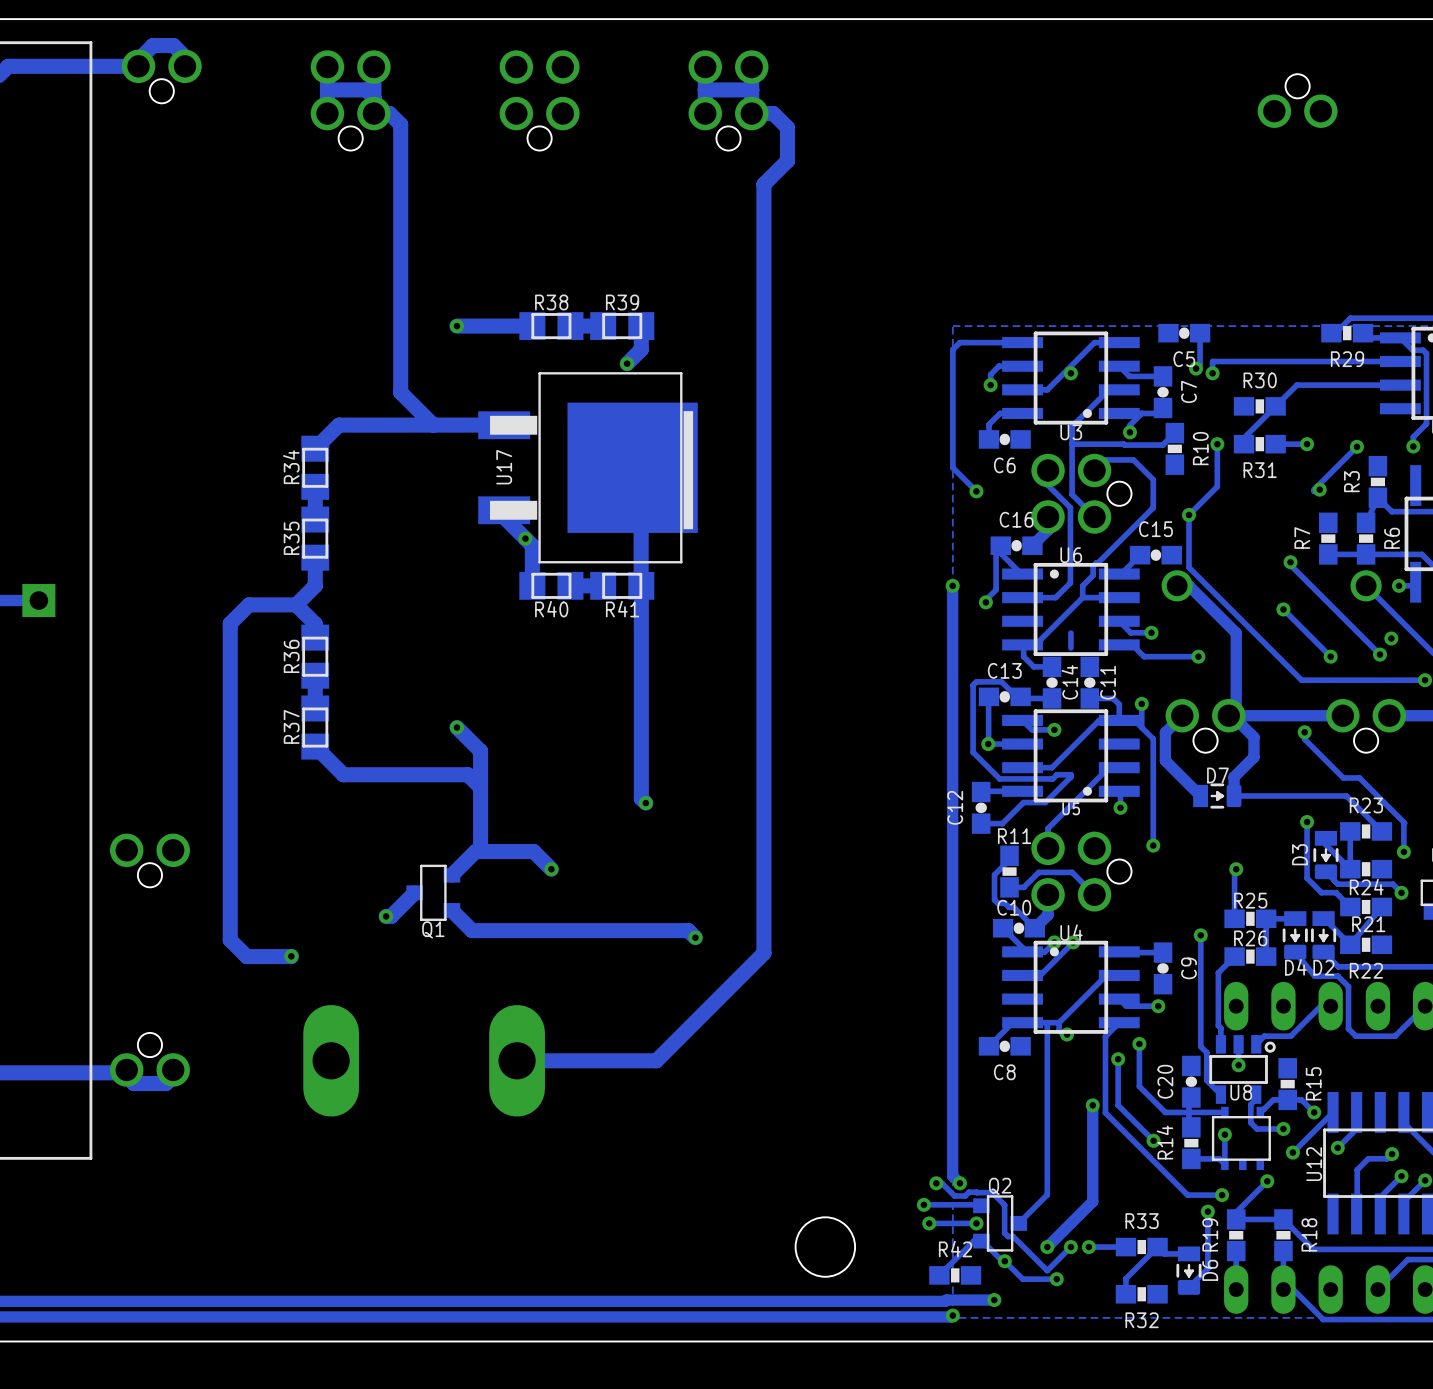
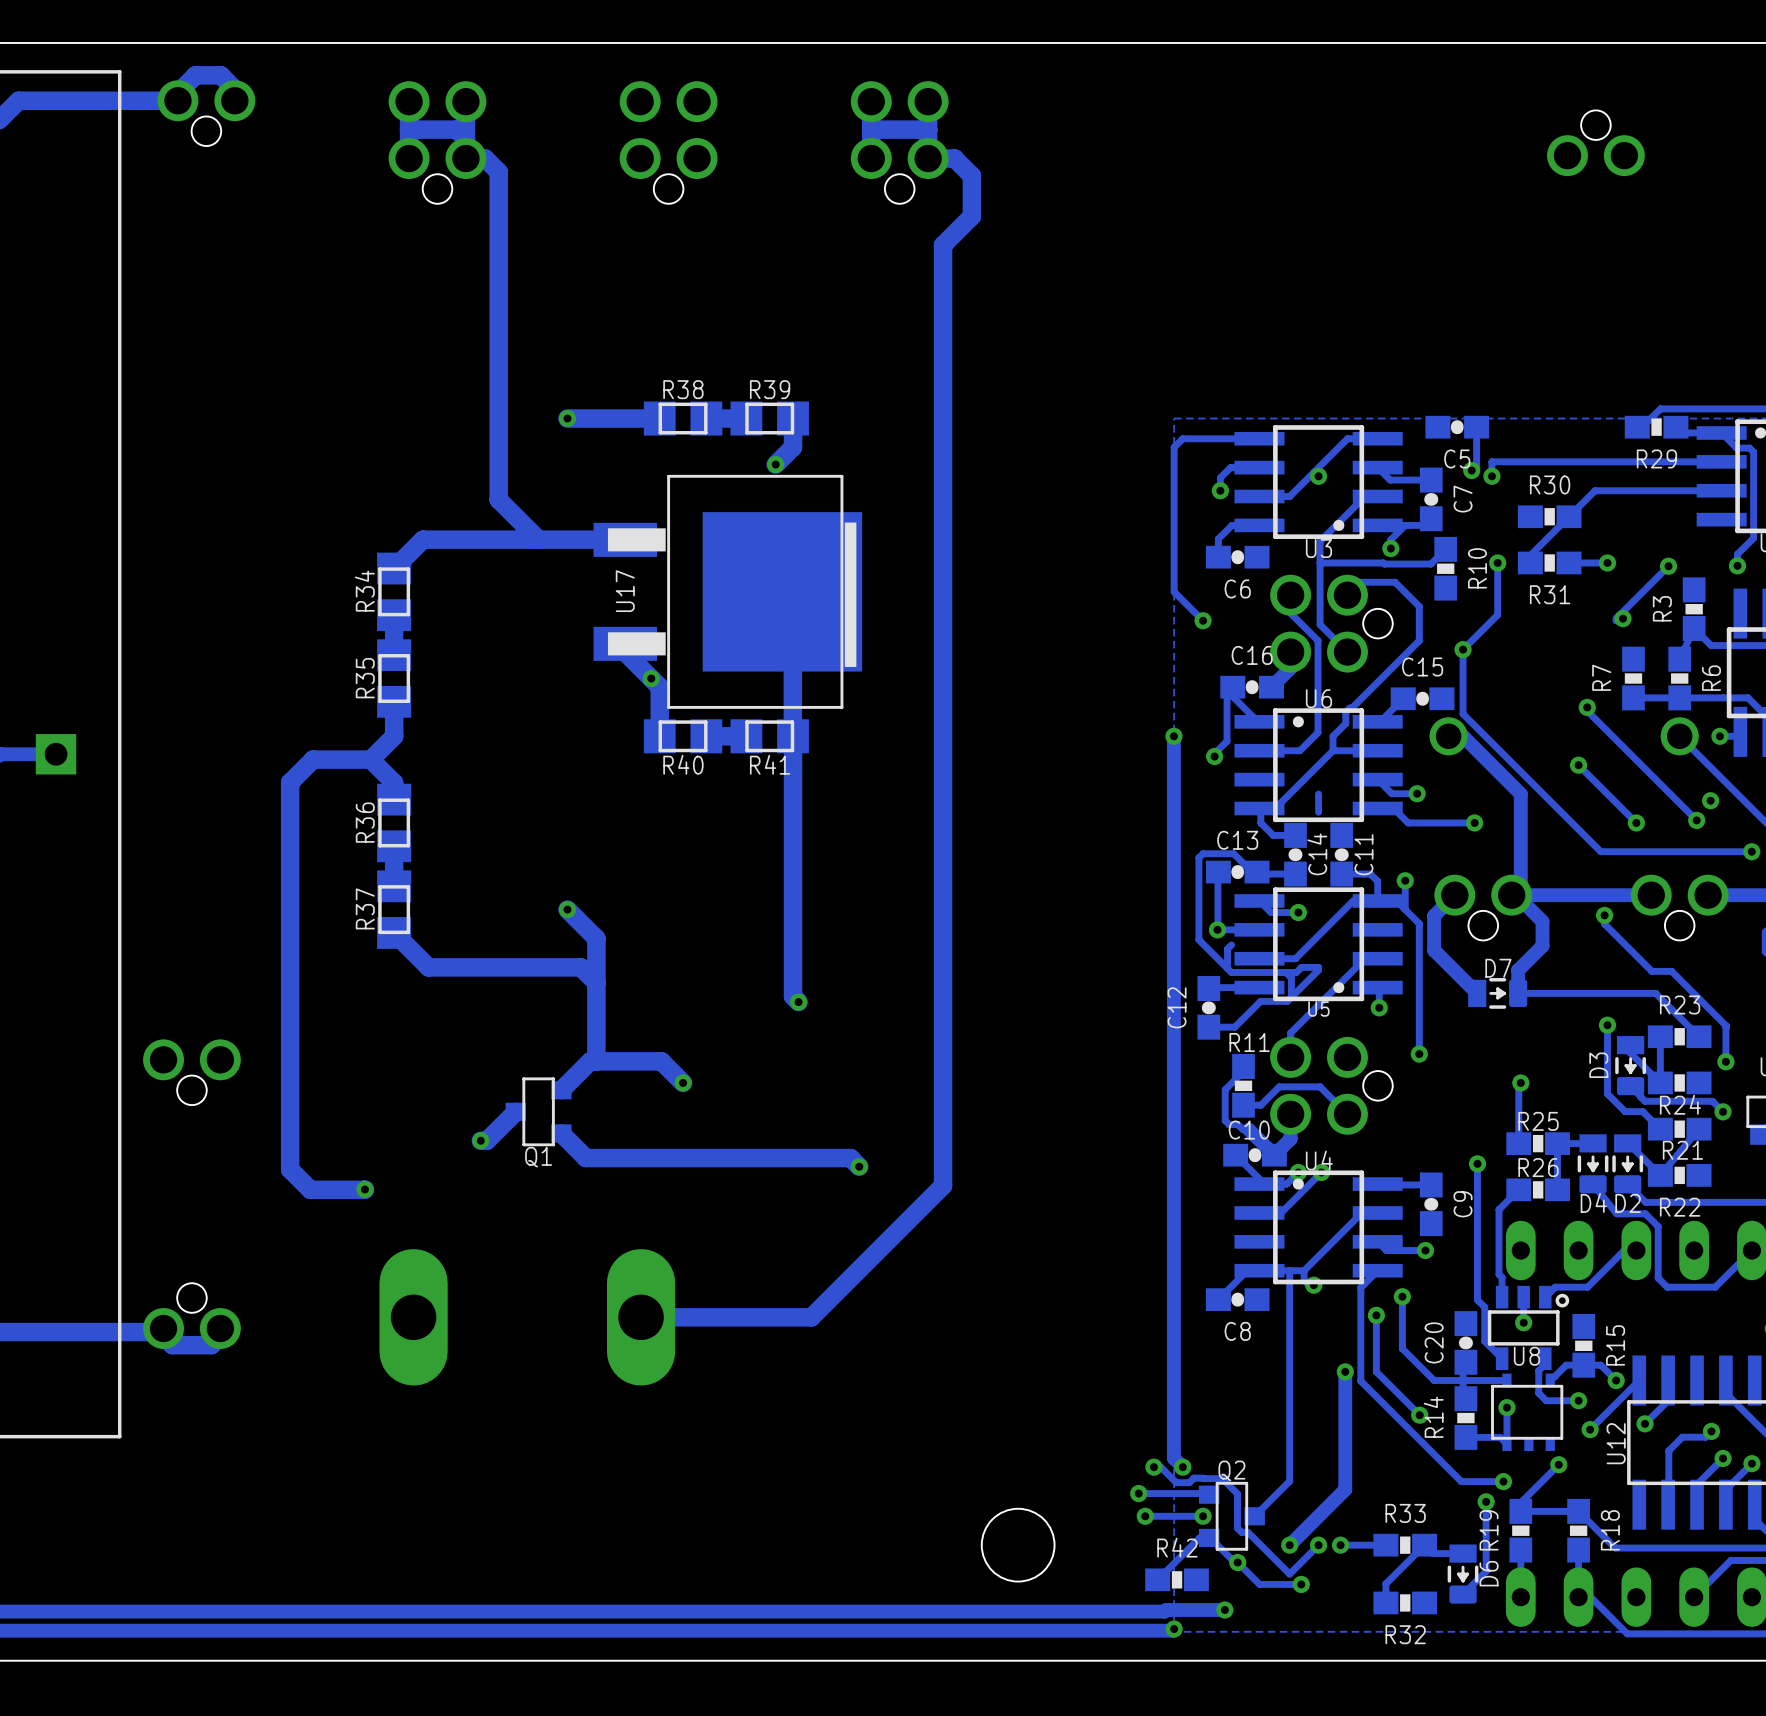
track: none -> (1231, 944) (1227, 949) (1227, 968)
track: none -> (1285, 972) (1291, 977) (1291, 997)
track width: thin (1013, 907) (1034, 928) -> thick (1248, 1129) (1274, 1155)

